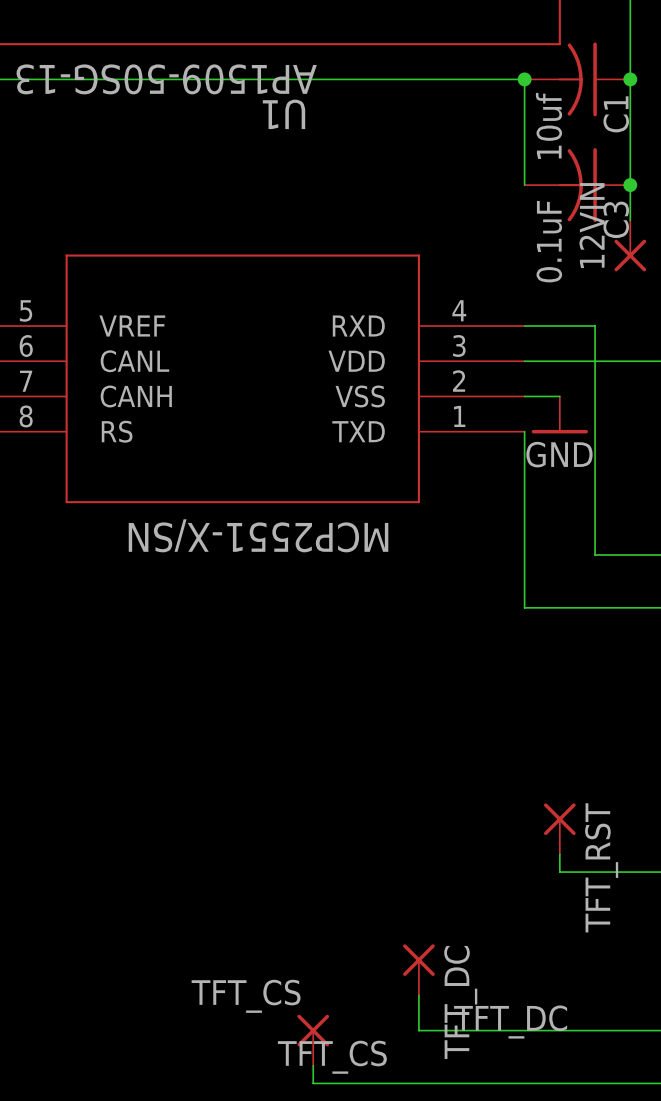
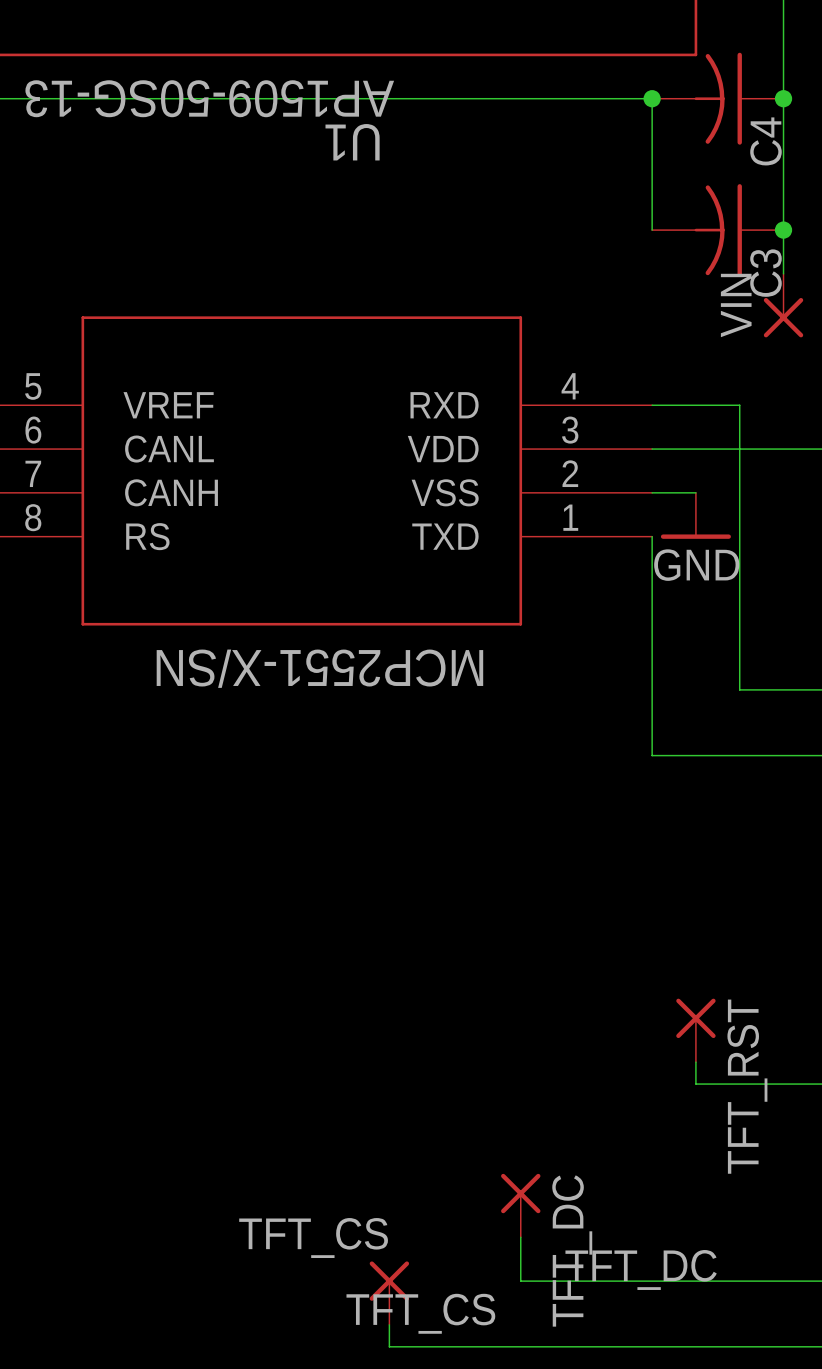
C1 name: C1 (616, 114) -> C4 (765, 141)
C1 value: 10uf (548, 125) -> none
12VIN name: 12VIN (592, 225) -> VIN (736, 305)
C3 value: 0.1uF (549, 241) -> none

